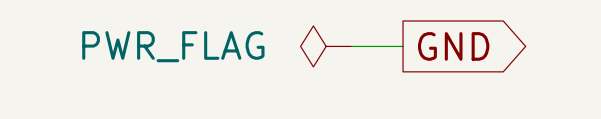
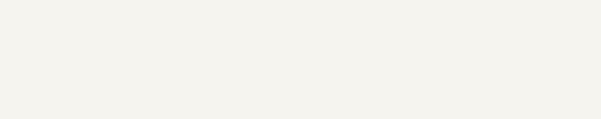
power symbol: PWR_FLAG (326, 46) -> none
wire: (351, 46) (403, 46) -> none
global label: GND (453, 46) -> none

